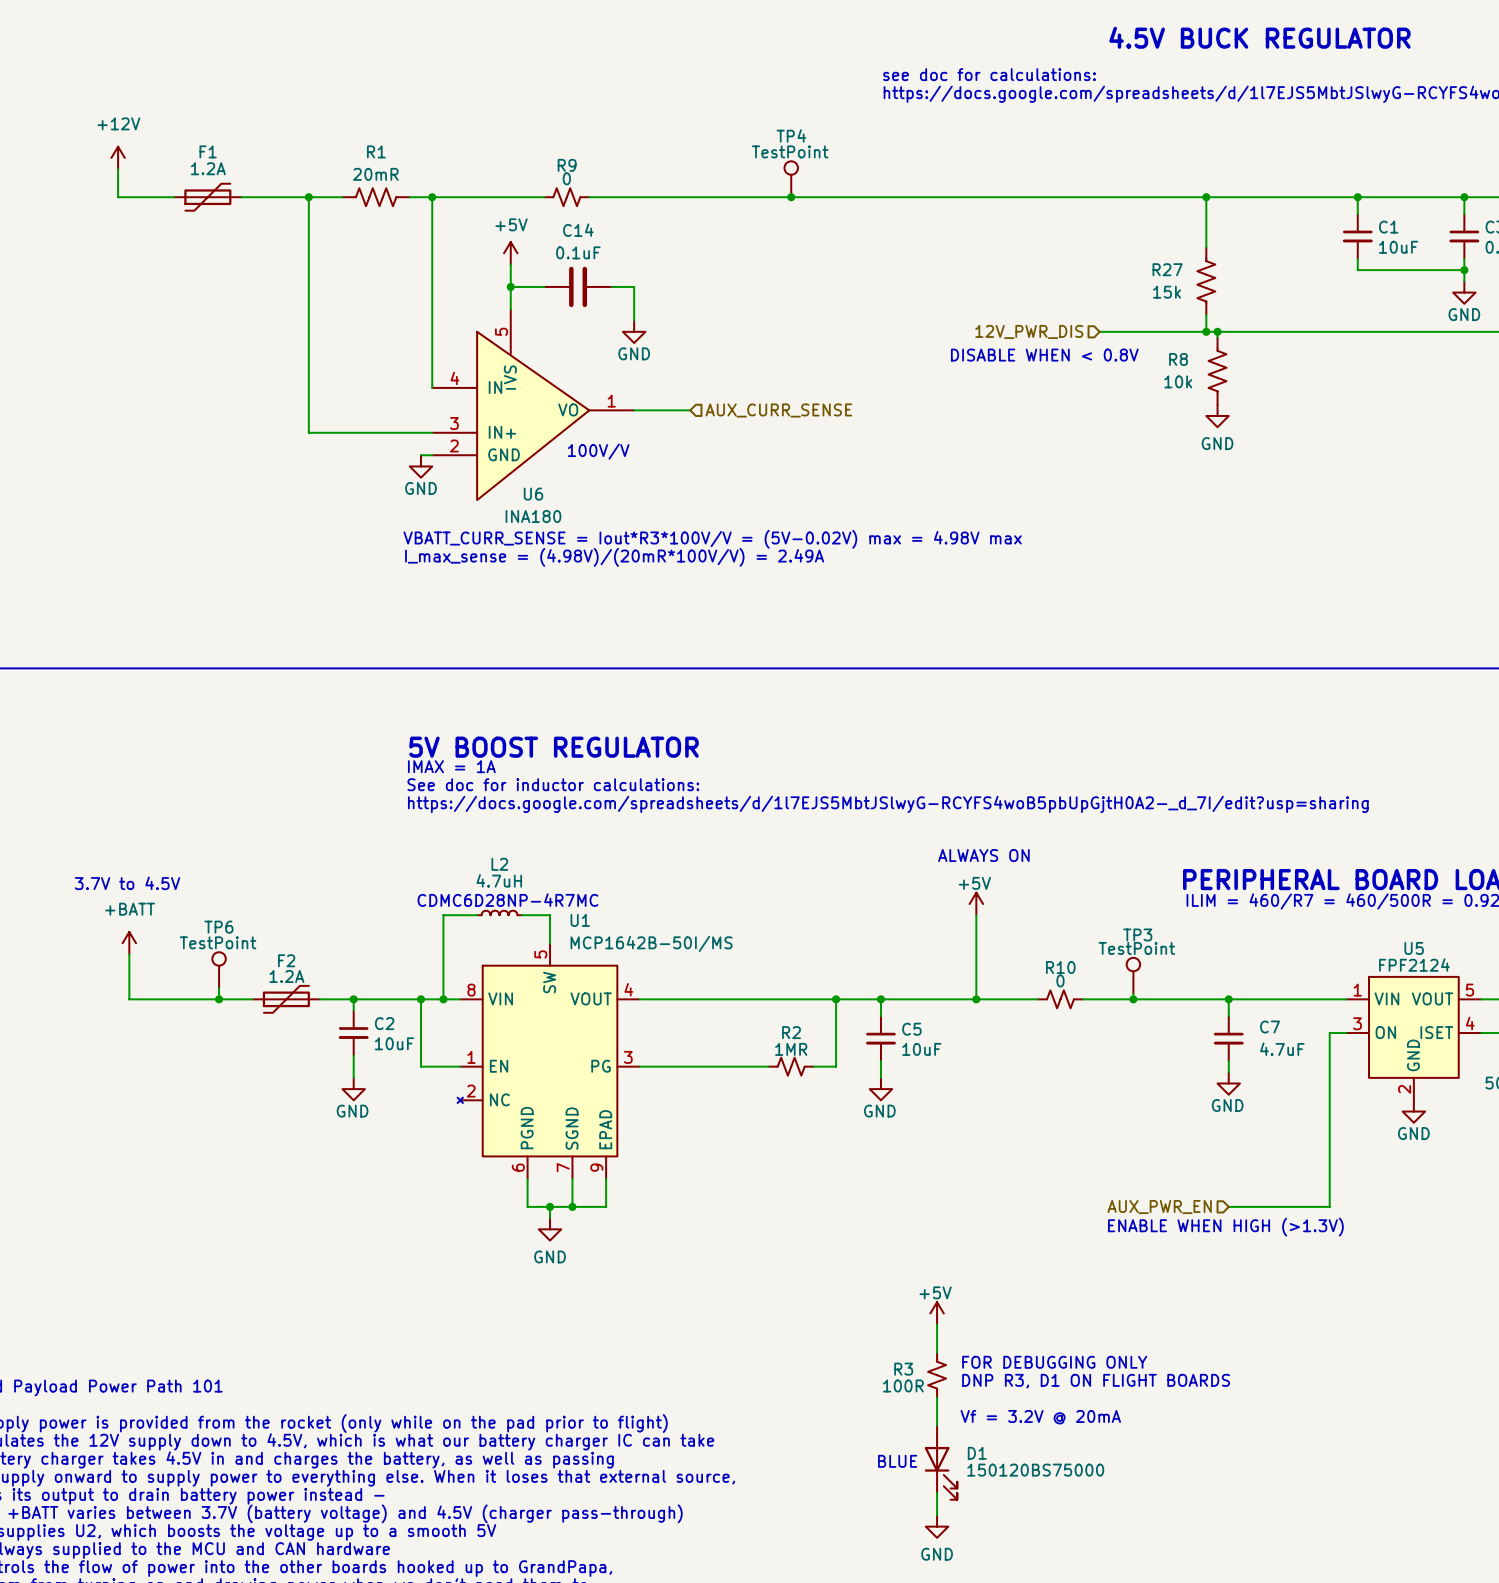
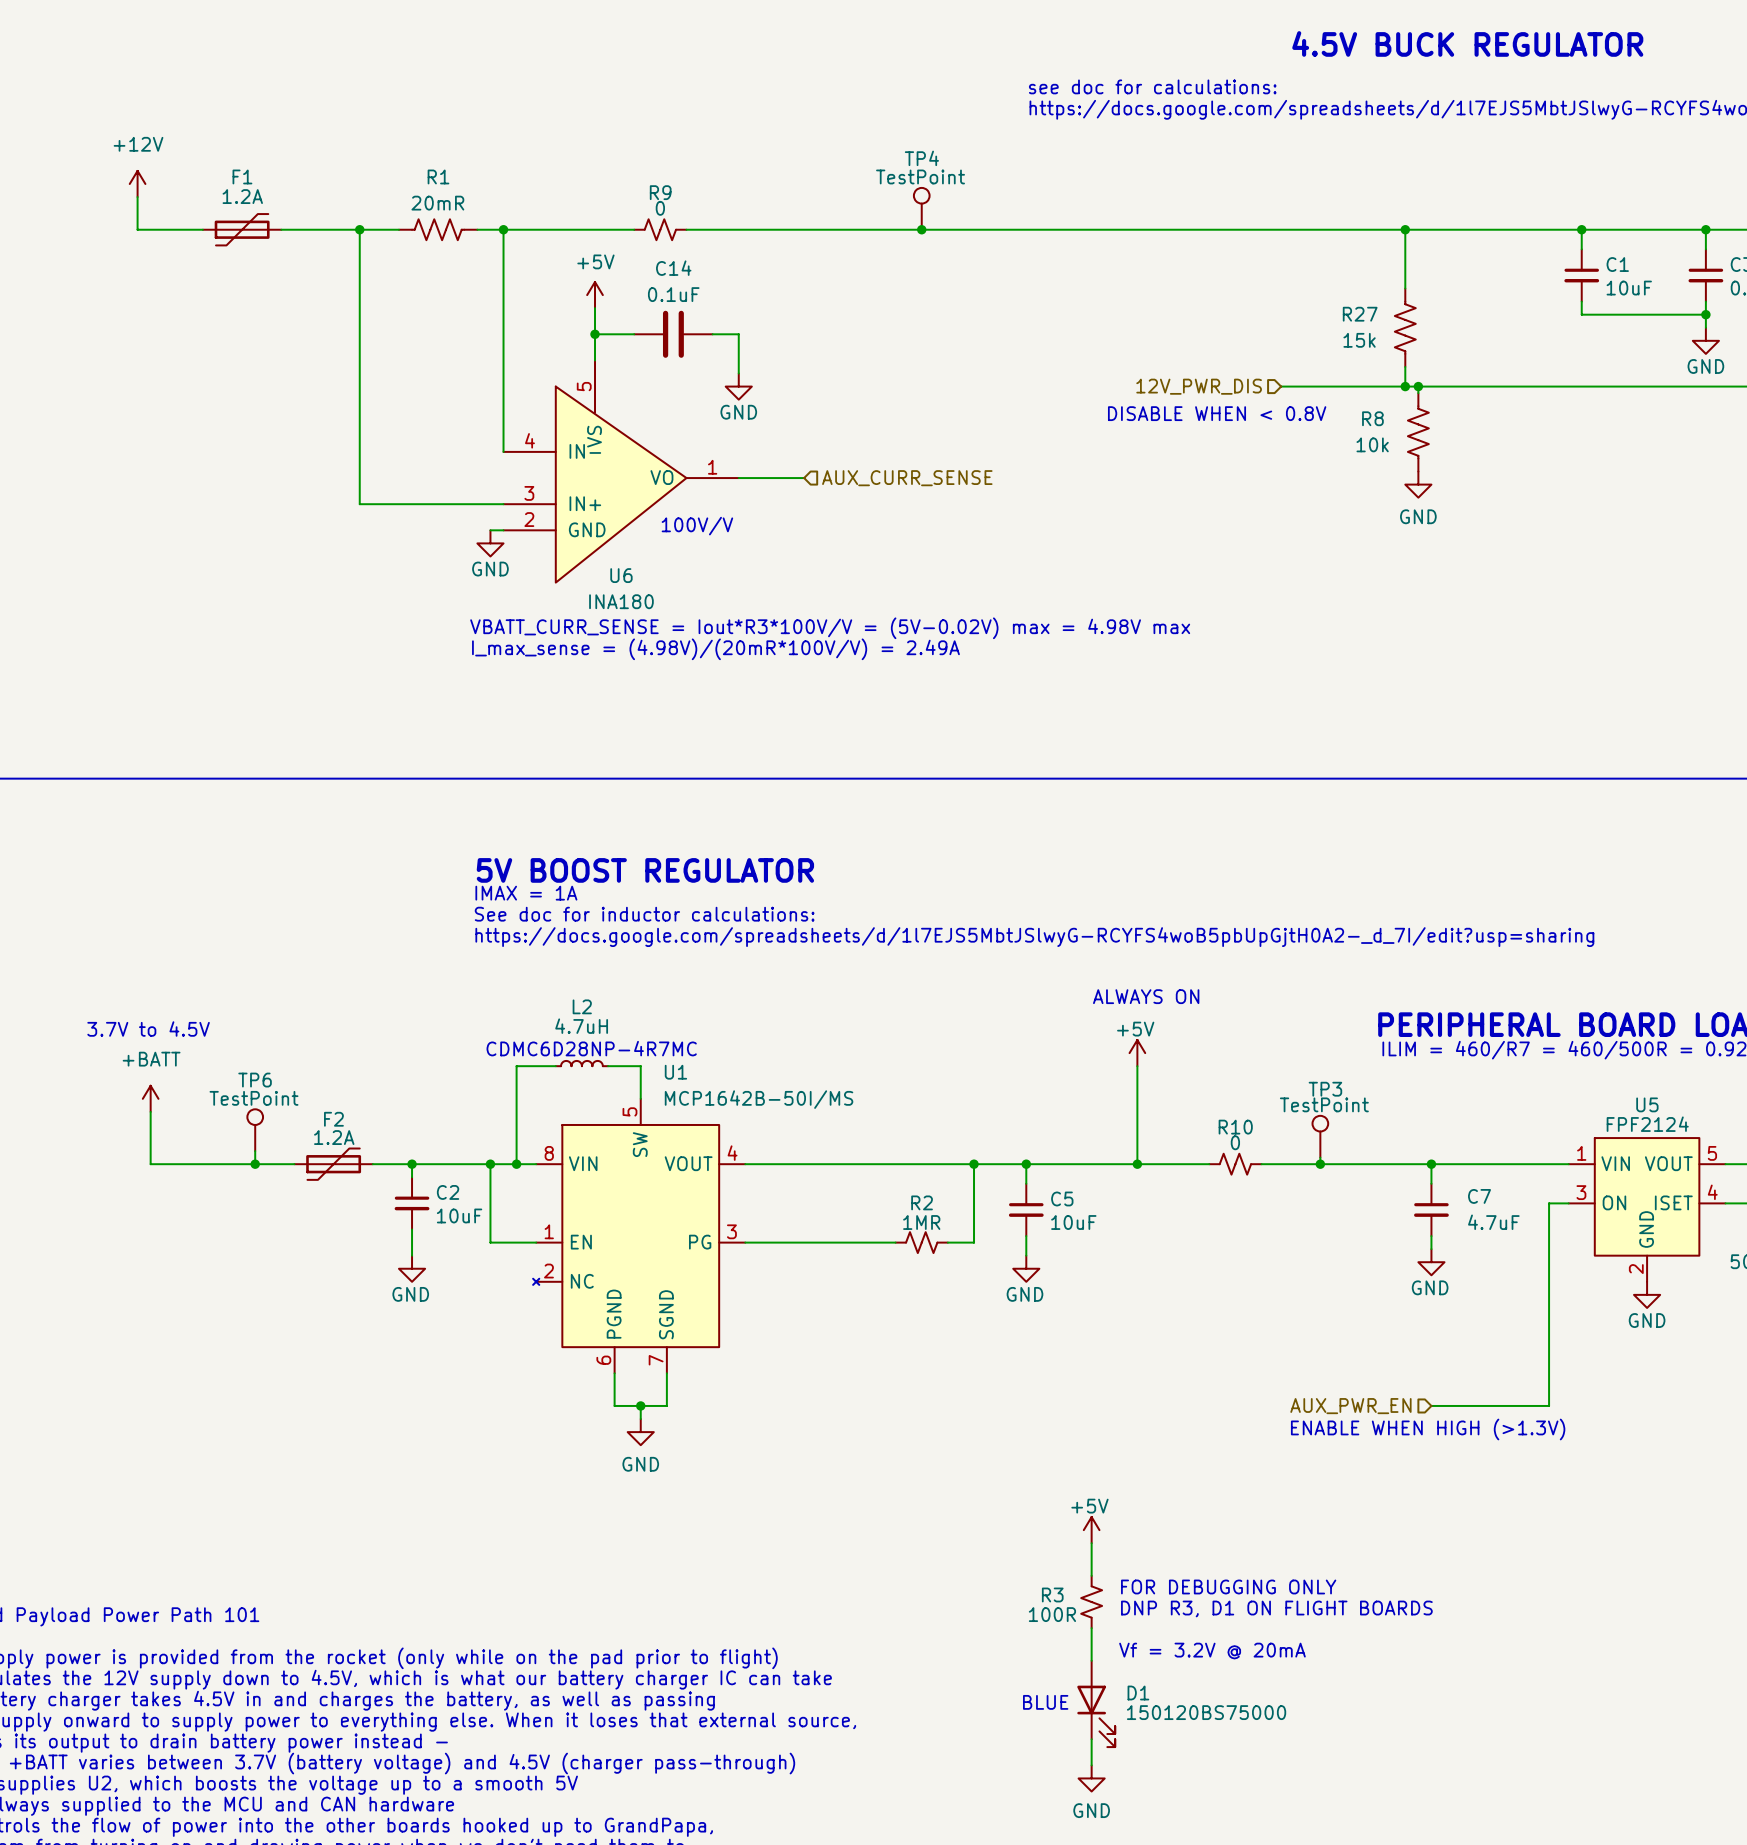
U1 symbol: [457, 943, 640, 1179] -> [533, 1098, 746, 1374]
wire: (606, 1178) (606, 1206) (572, 1206) -> none
junction: (572, 1206) -> none

